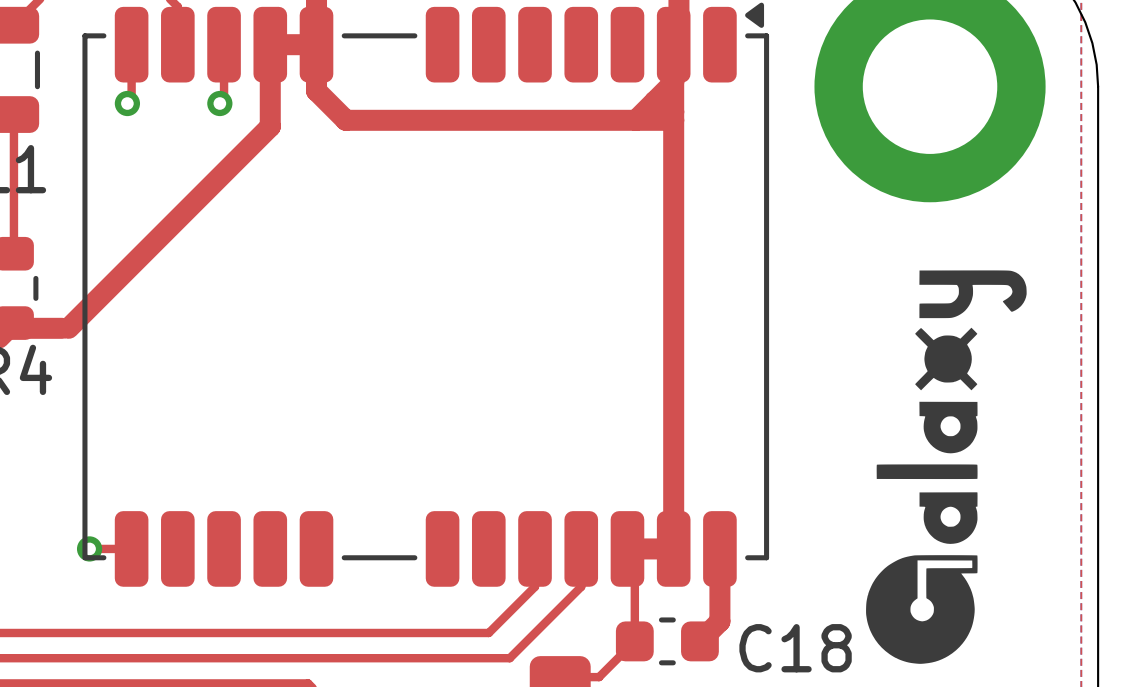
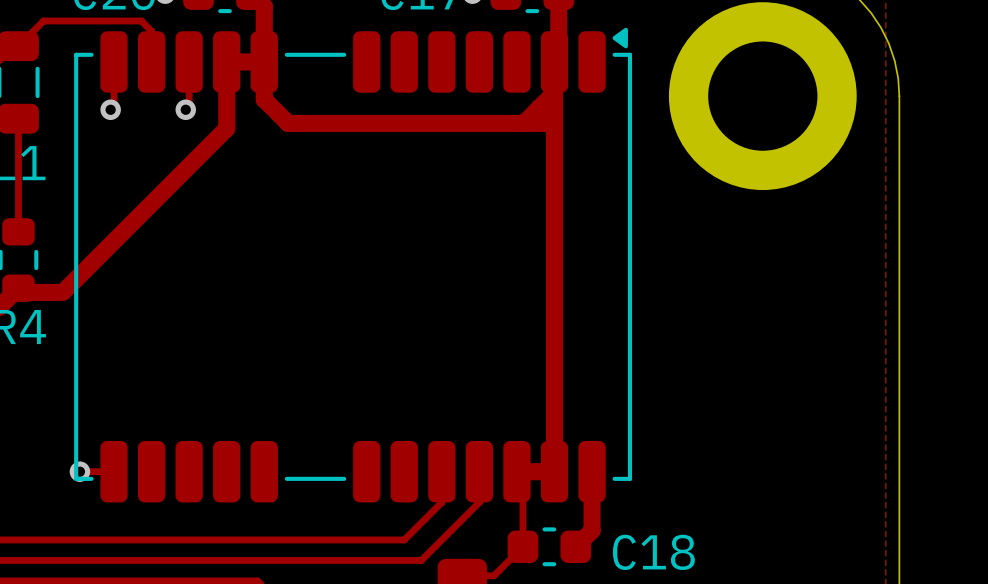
drawing: [866, 270, 1027, 664] -> none

